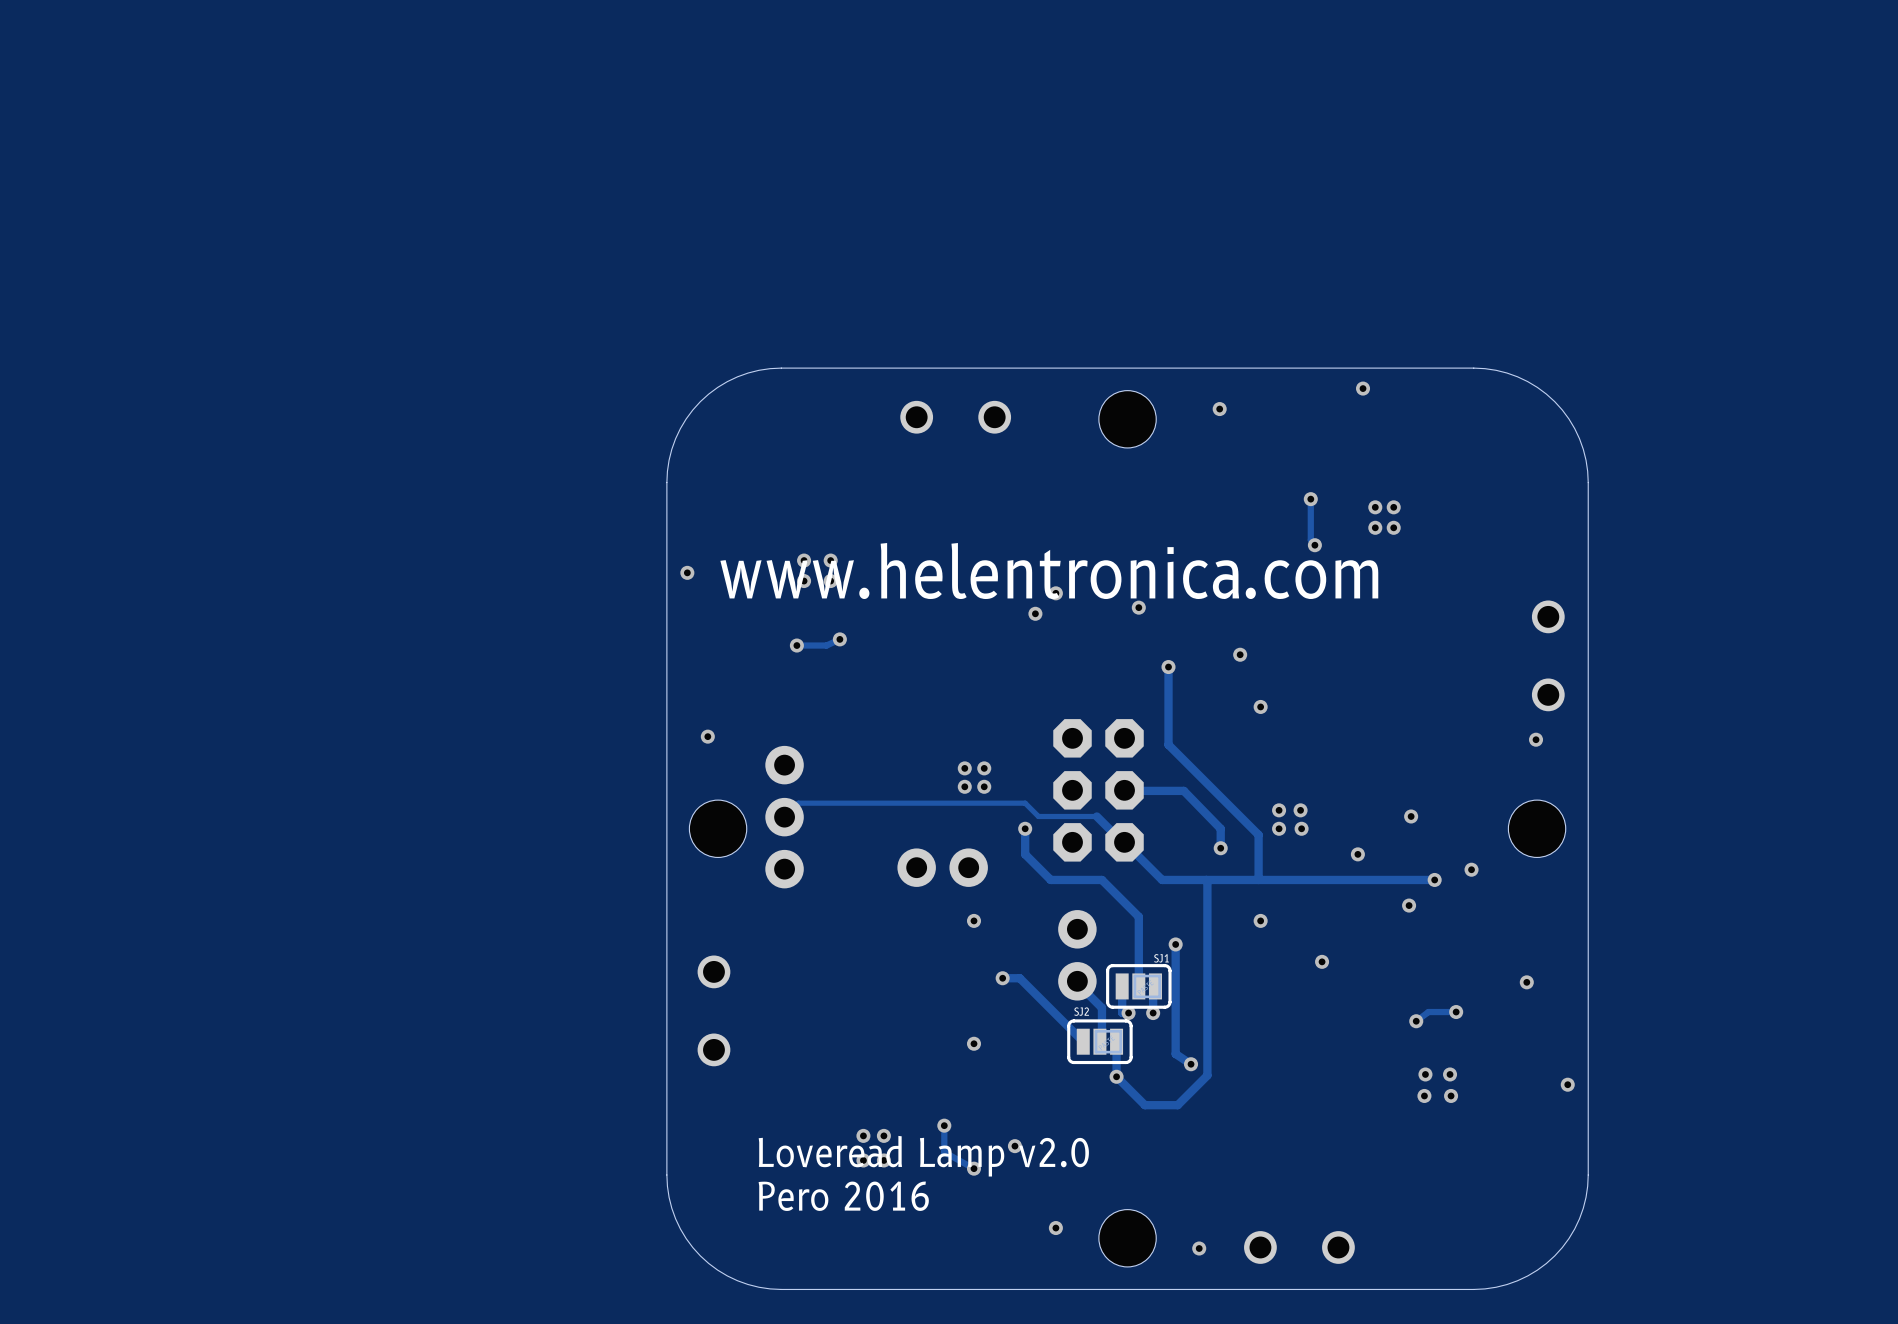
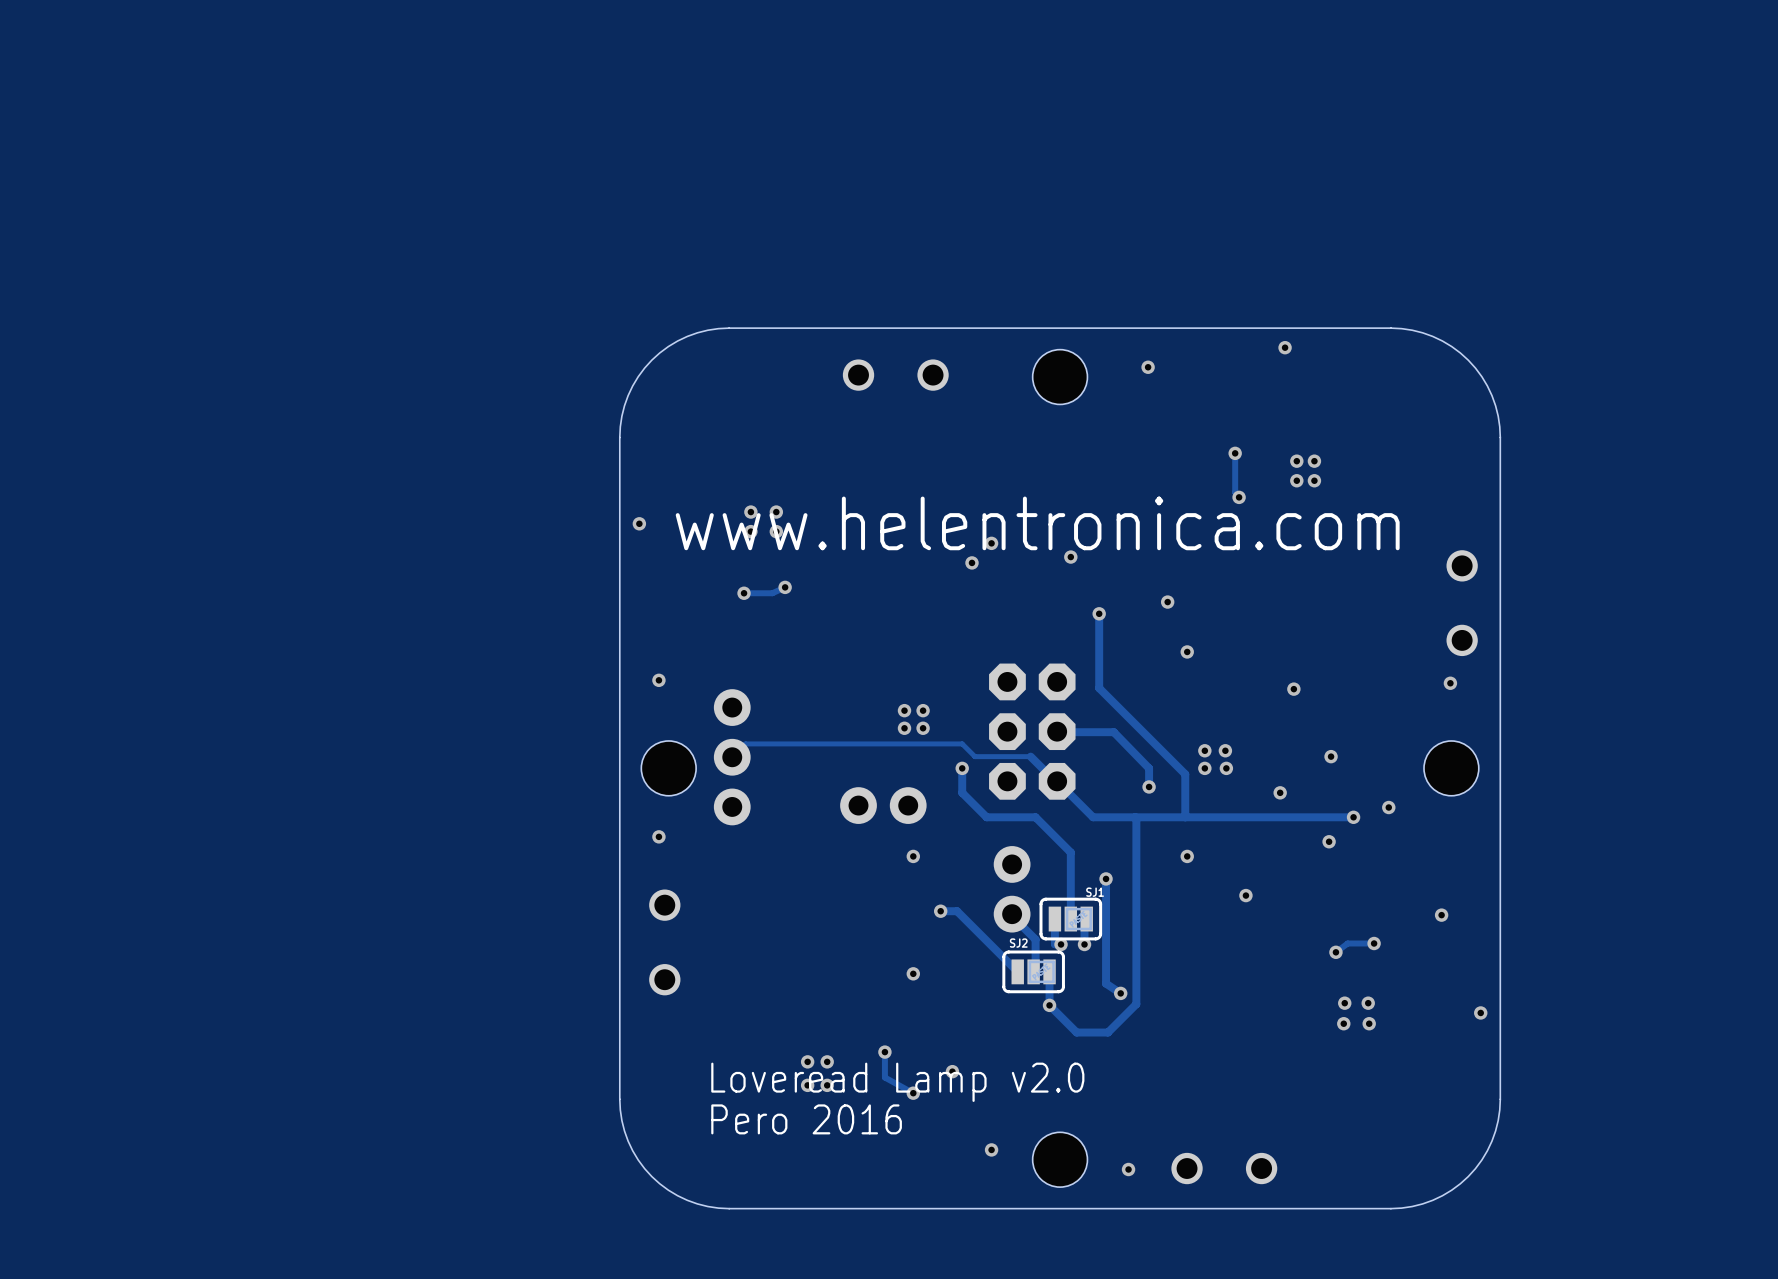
via: none -> (1293, 689)
via: none -> (658, 836)

